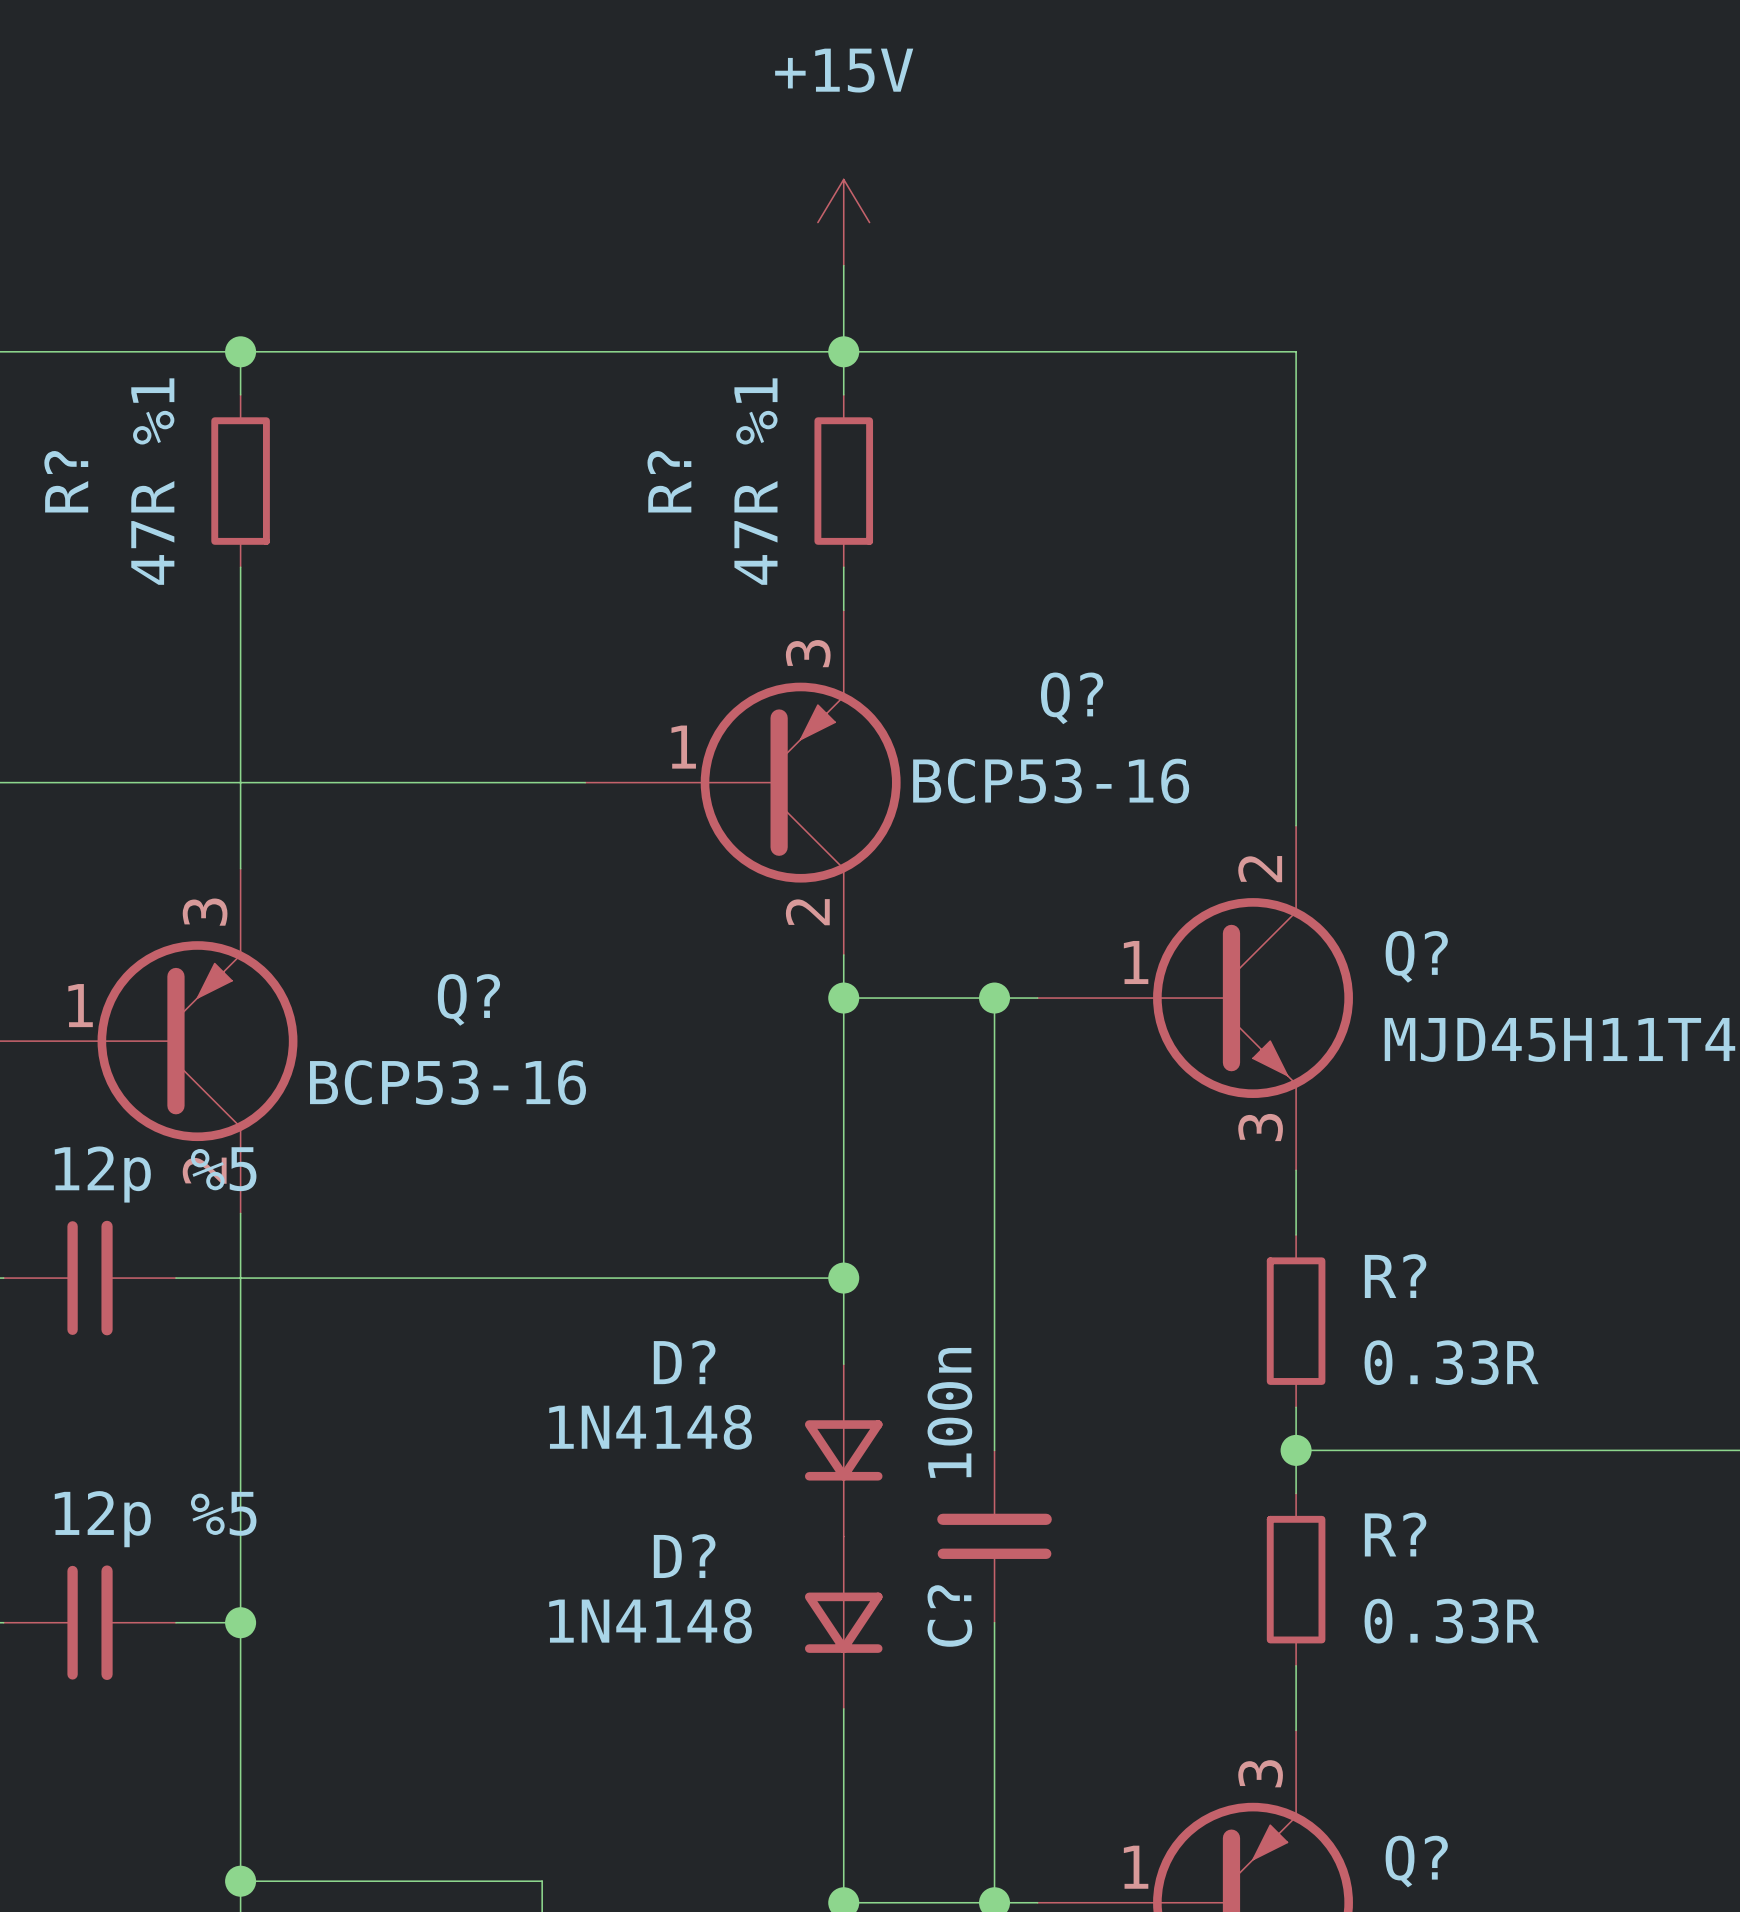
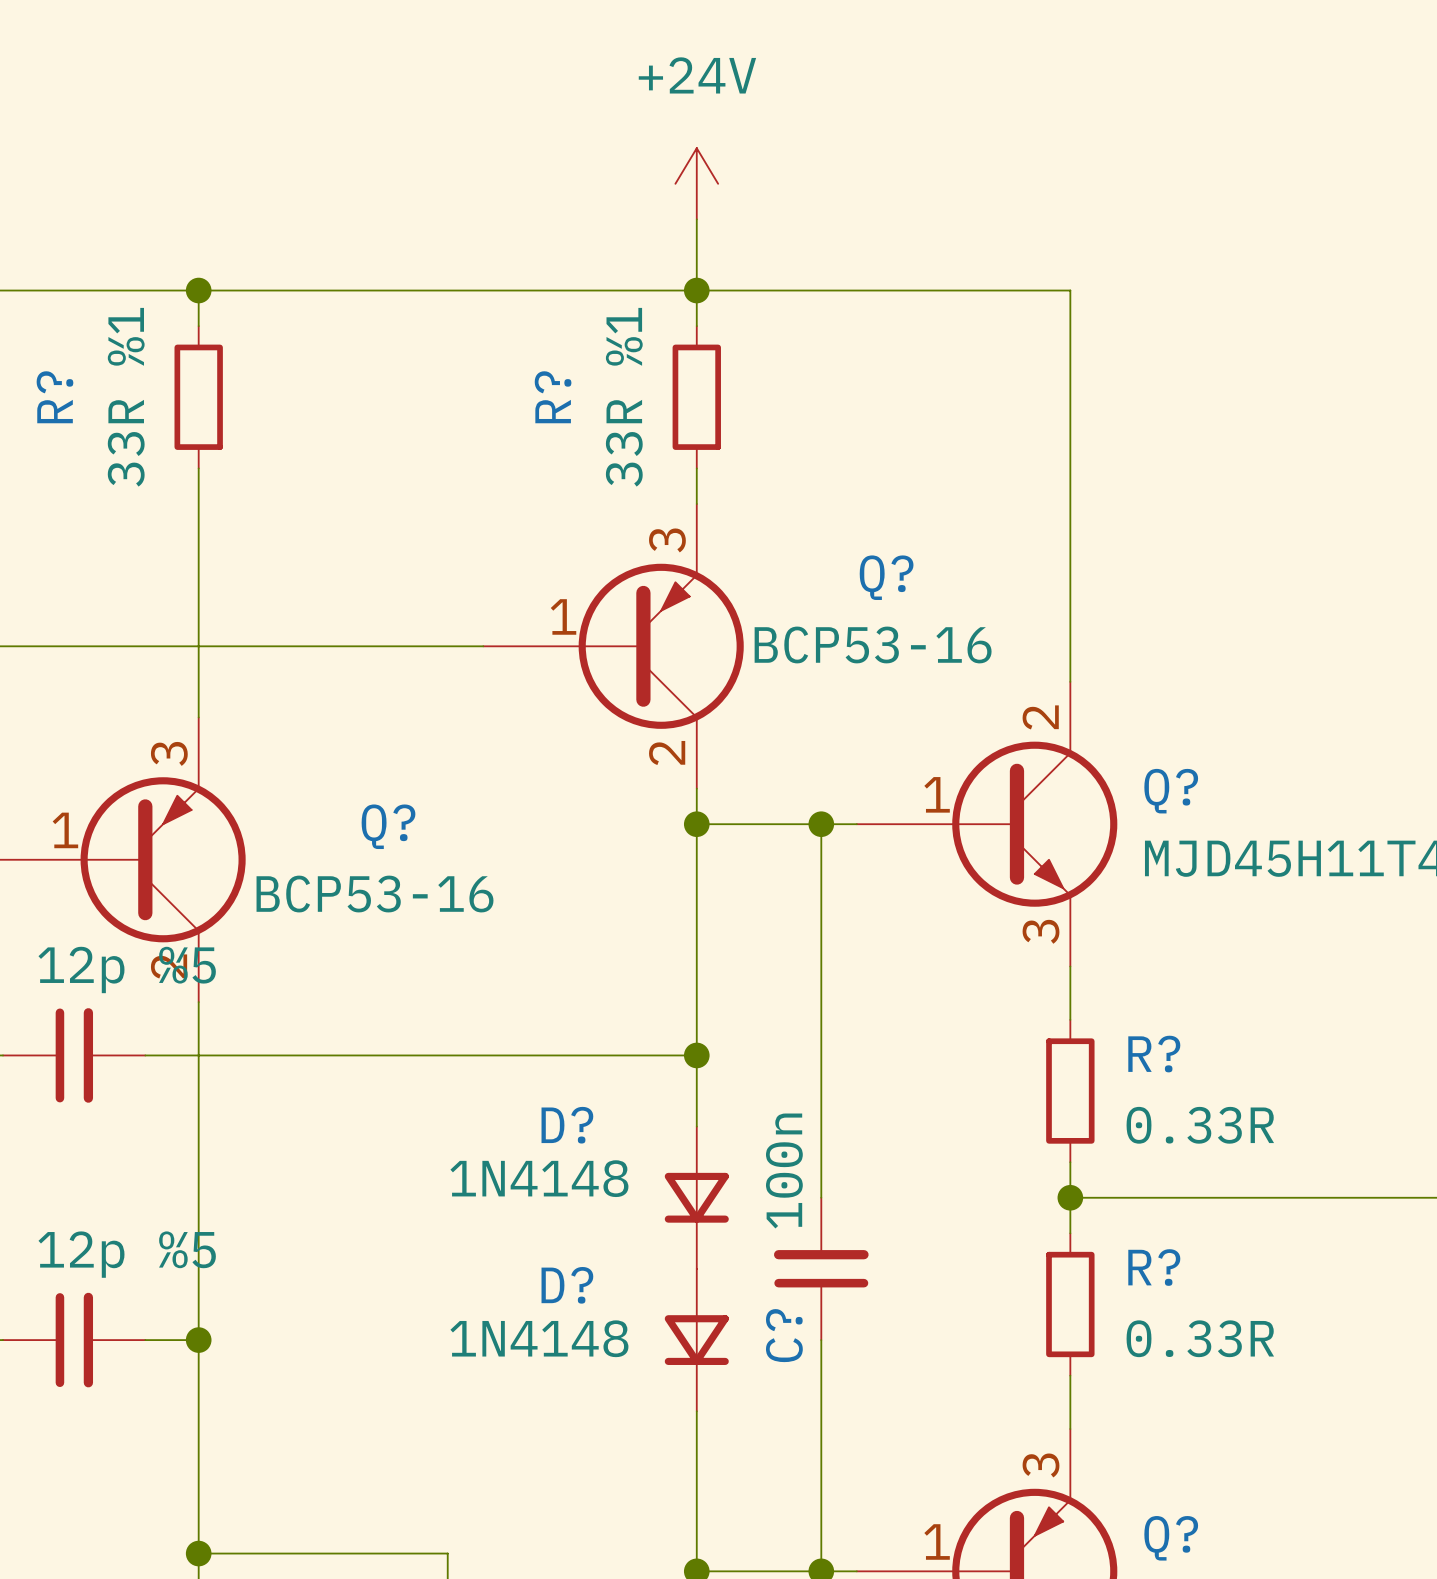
power symbol: +15V (843, 222) -> +24V (696, 183)
R? value: 47R %1 (152, 481) -> 33R %1 (126, 397)
R? value: 47R %1 (755, 481) -> 33R %1 (624, 397)

